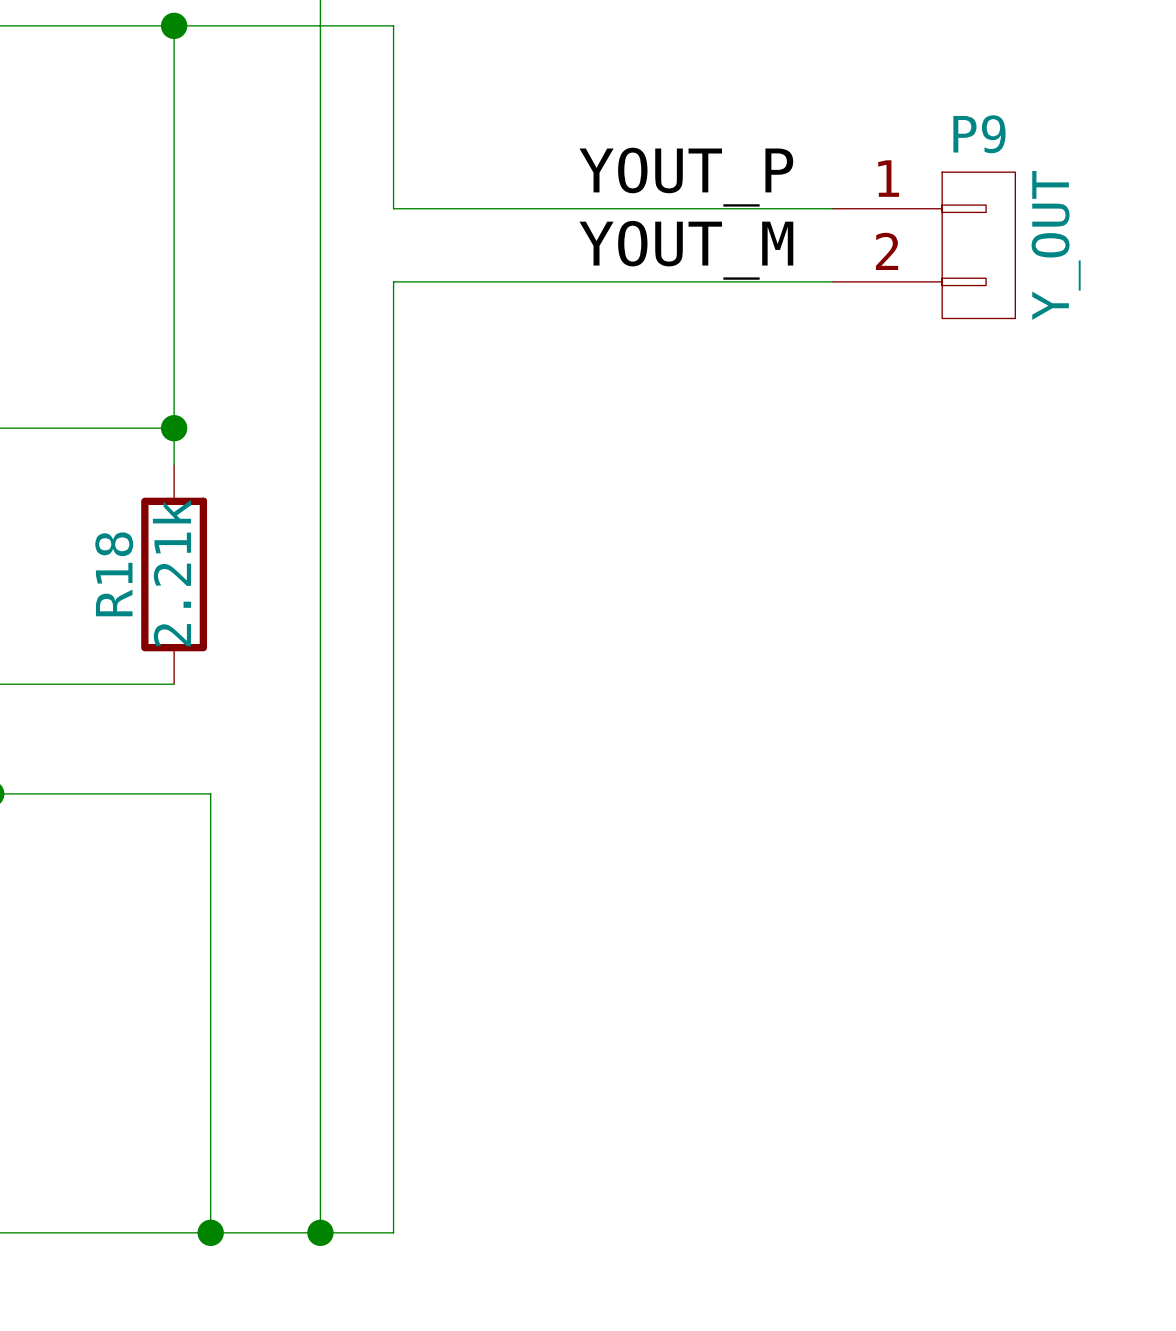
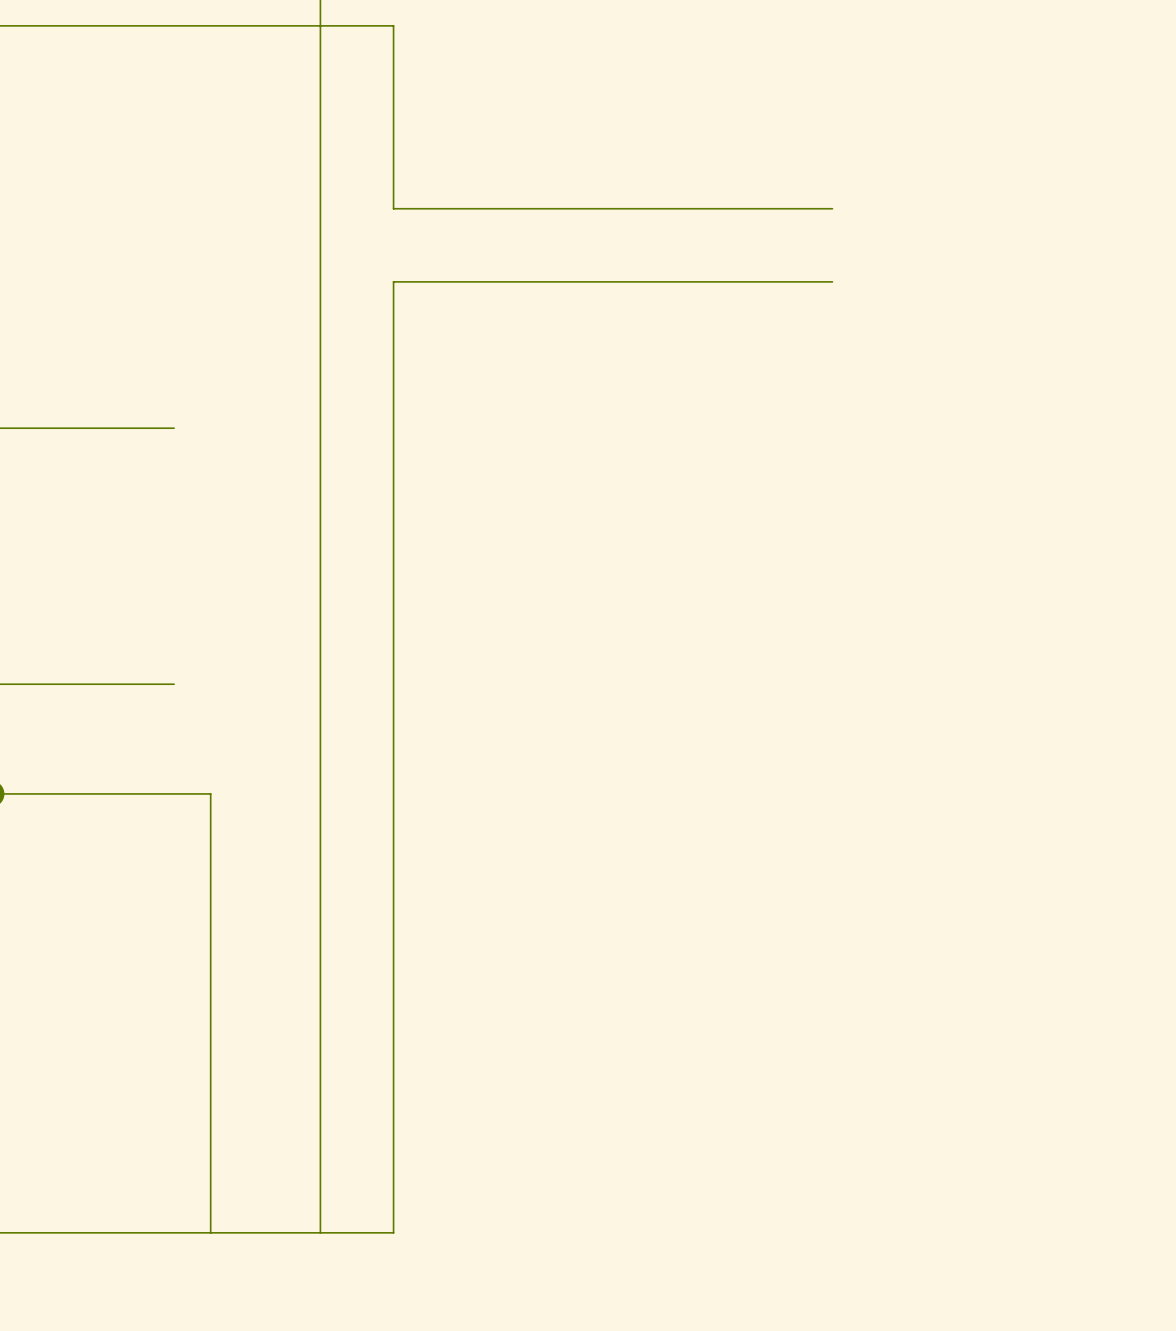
wire: (174, 25) (174, 464) -> none
junction: (174, 25) -> none
label: YOUT_P (686, 177) -> none
P9: Y_OUT (923, 245) -> none
label: YOUT_M (686, 250) -> none
junction: (174, 428) -> none
R18: 2.21k (174, 574) -> none
junction: (210, 1232) -> none
junction: (320, 1232) -> none

